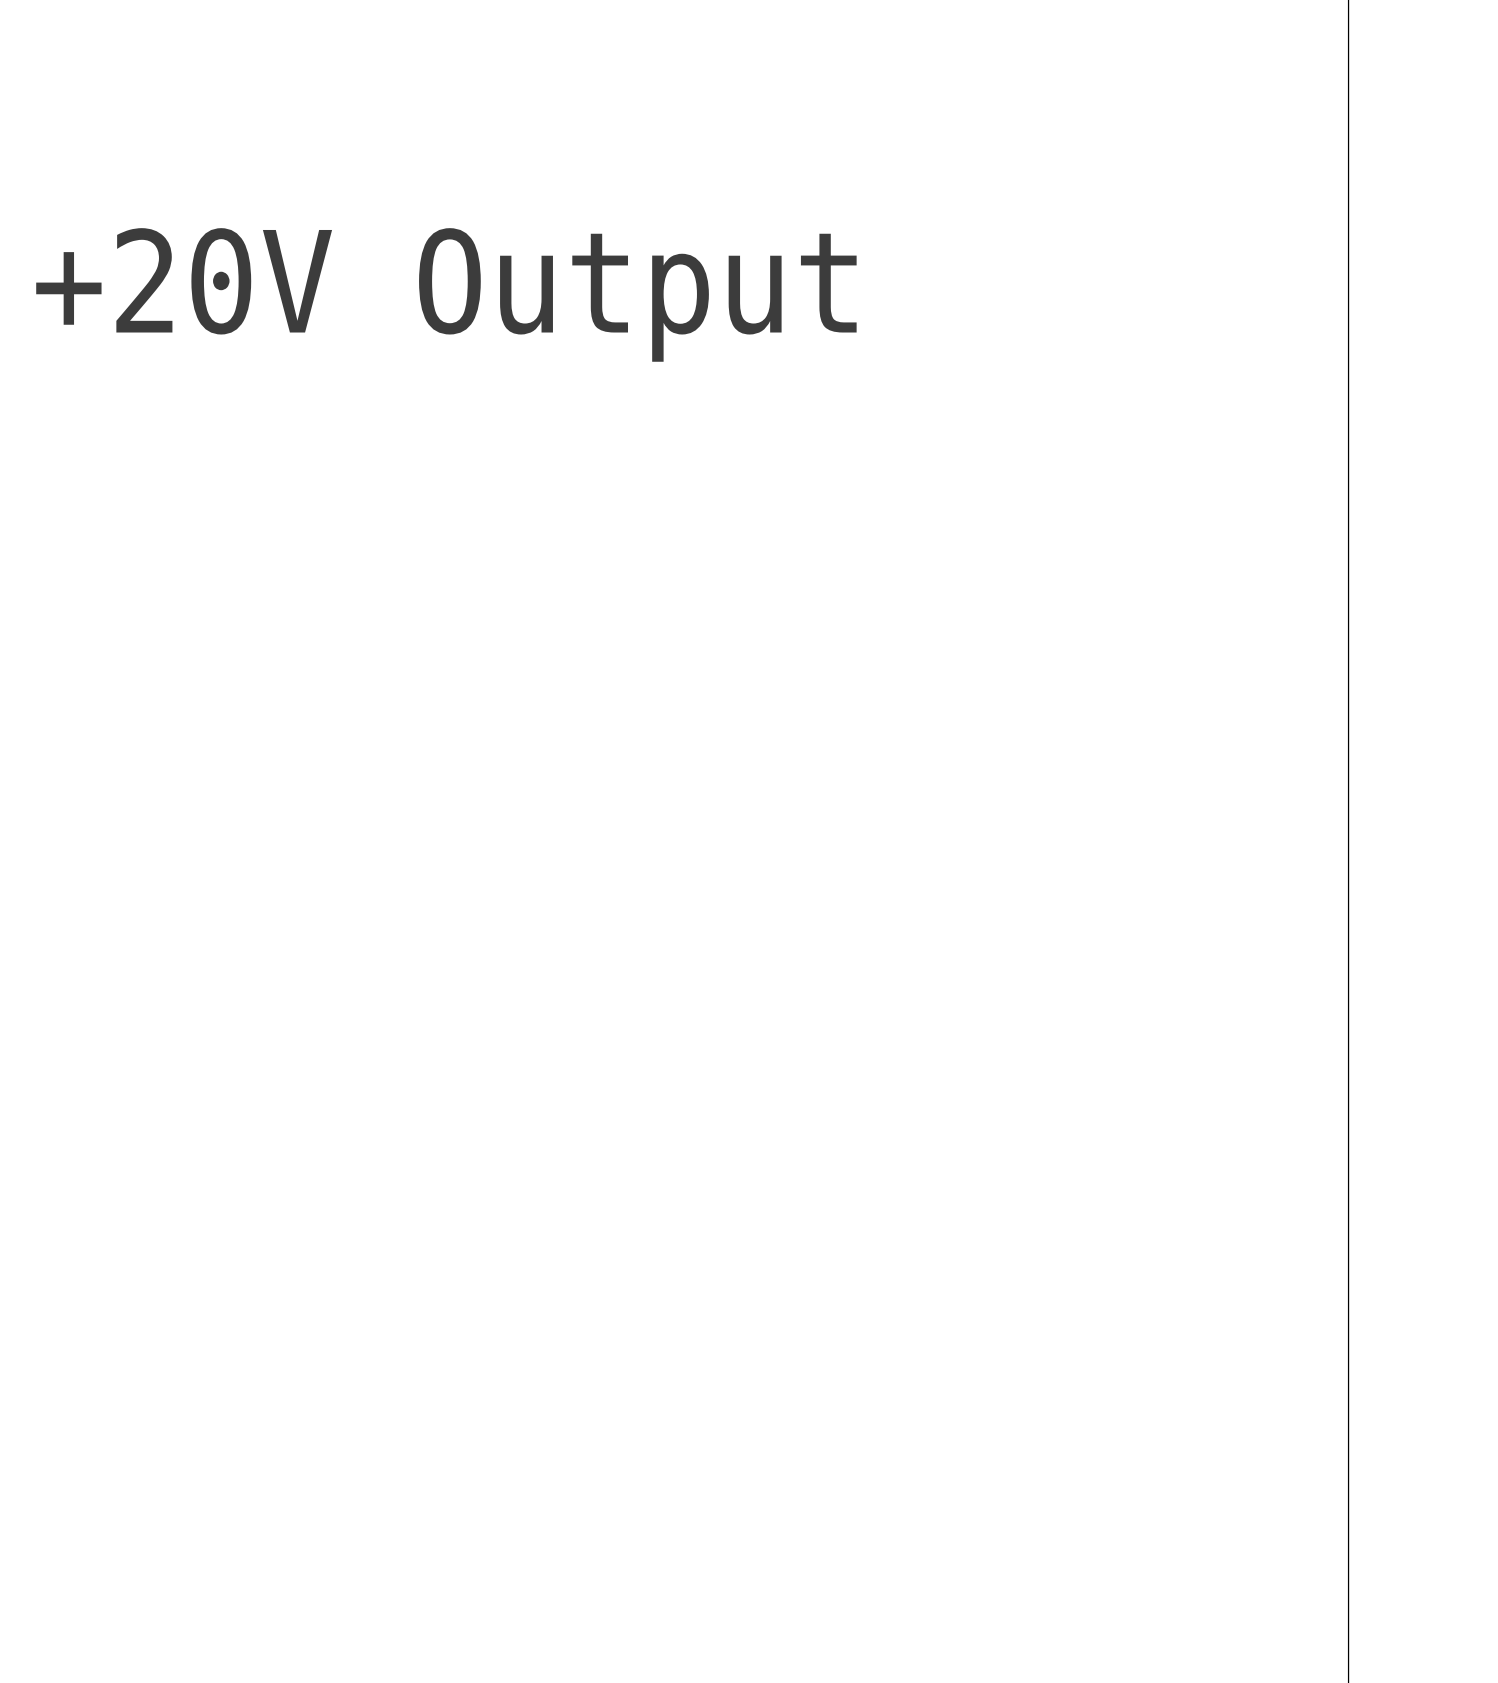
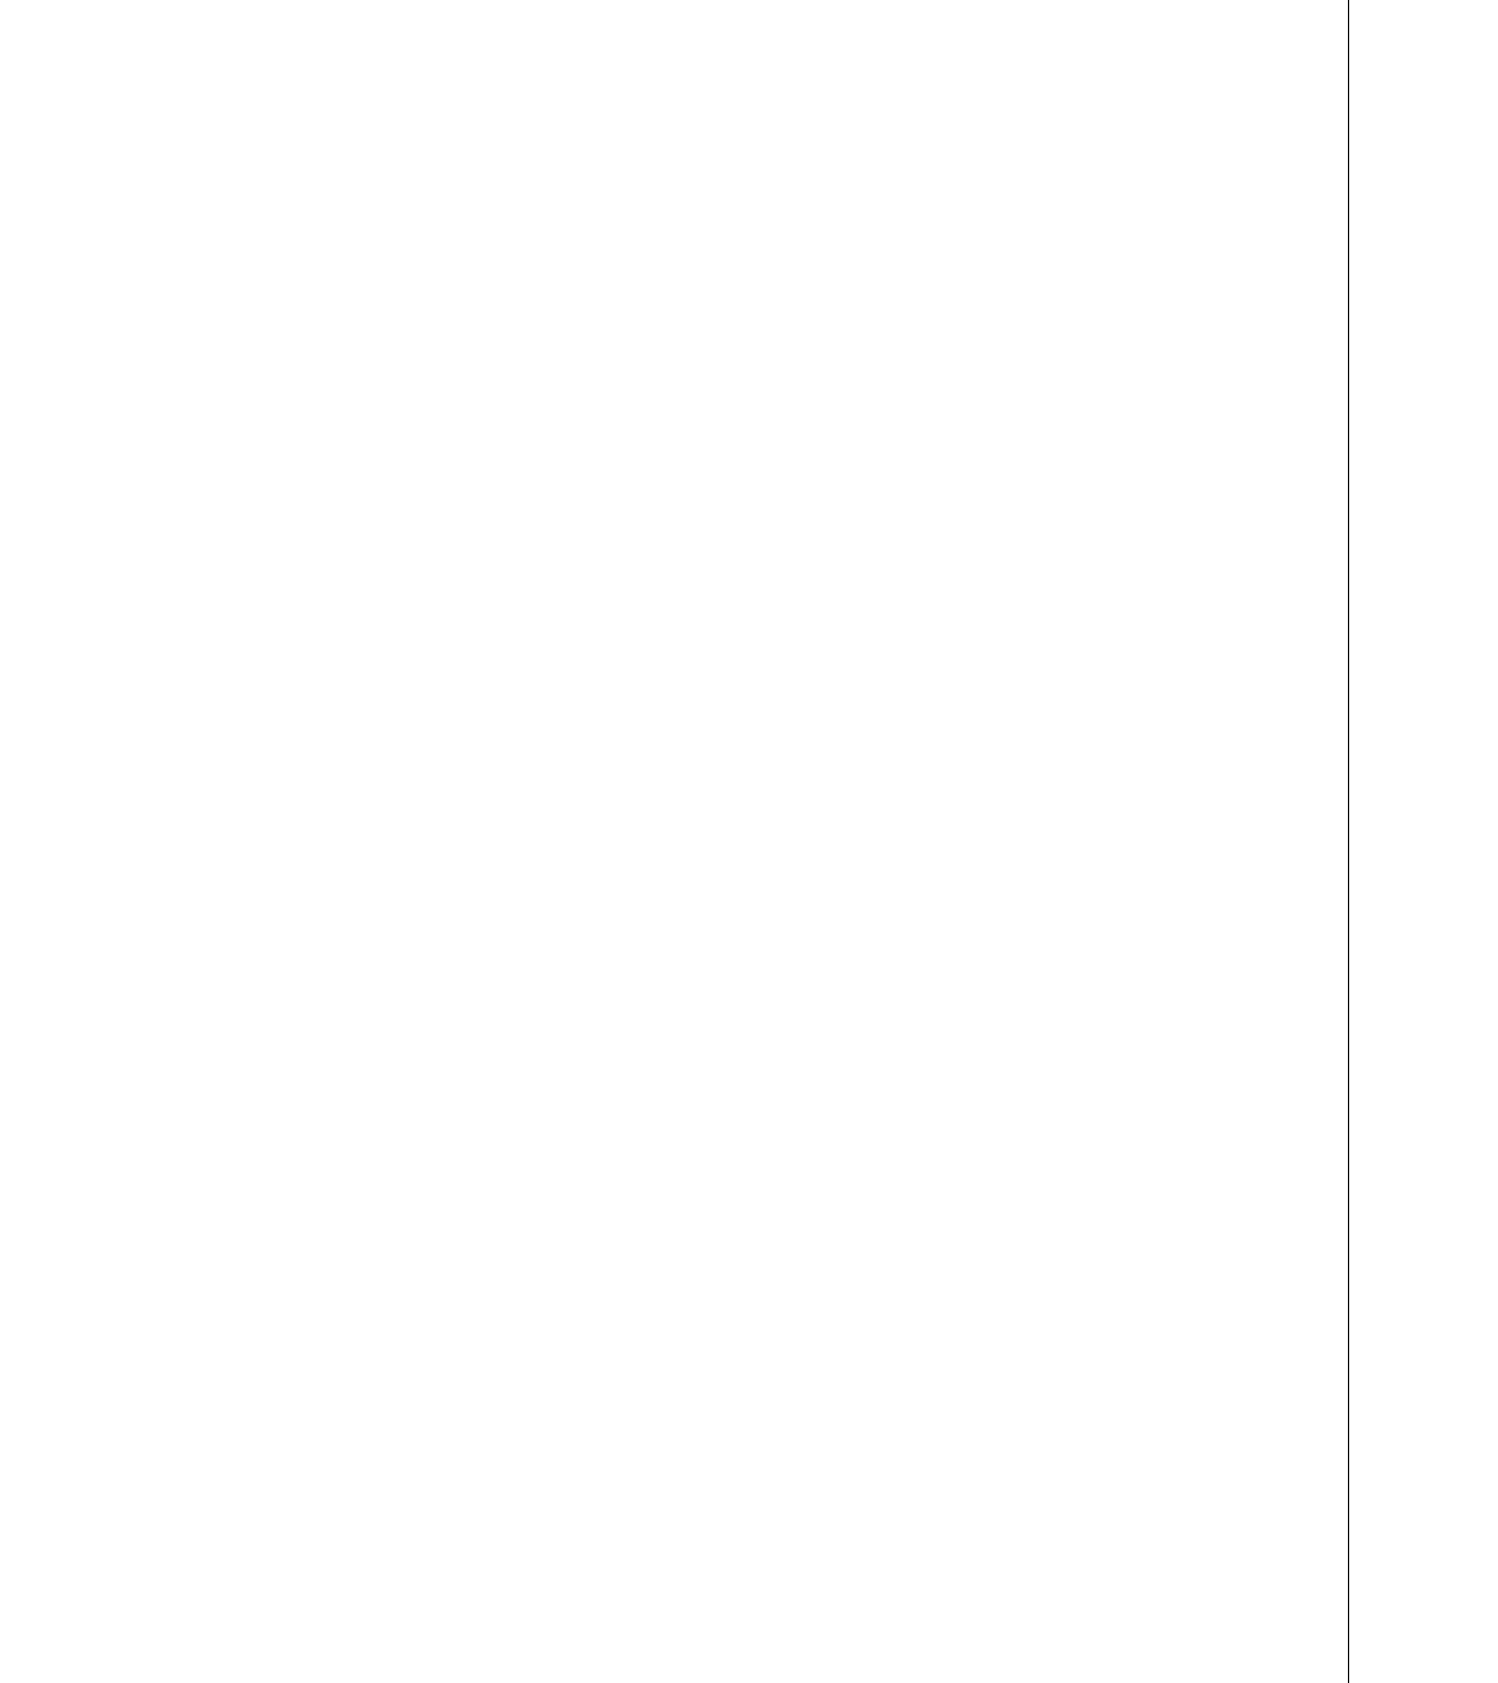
text: +20V Output (446, 294) -> none

